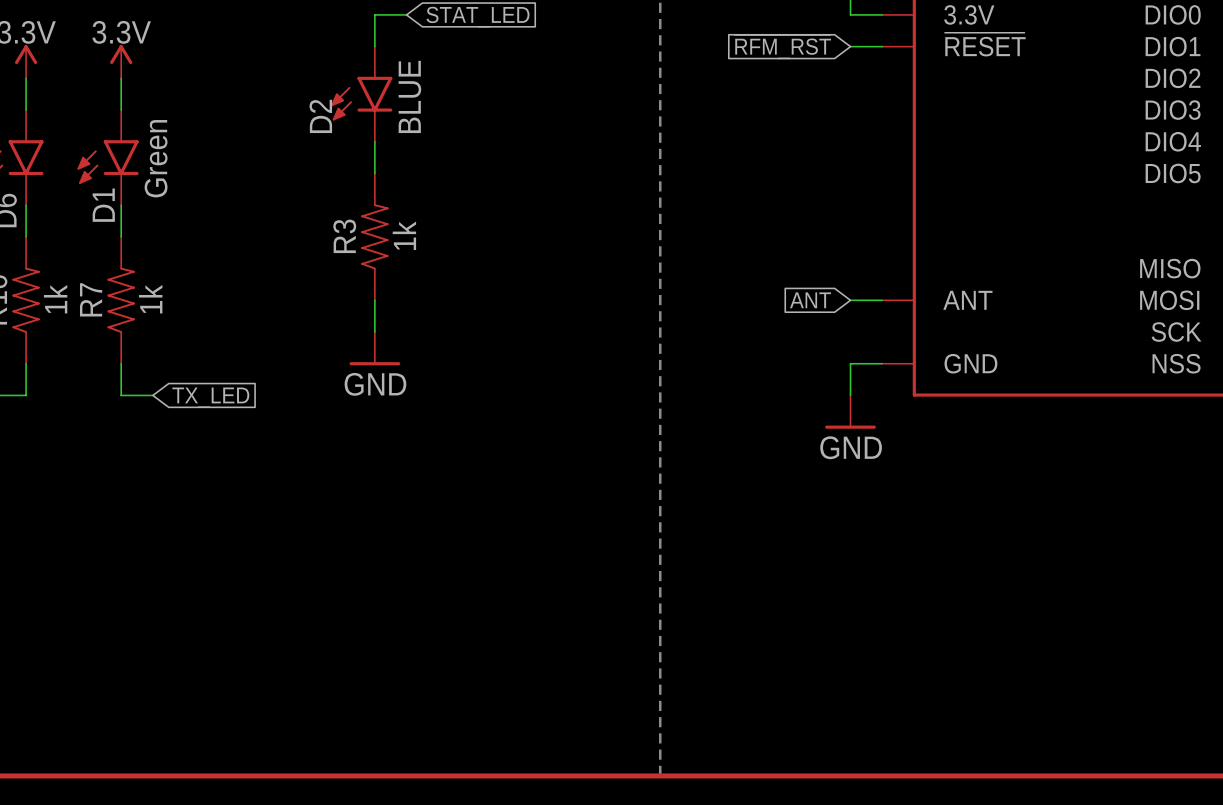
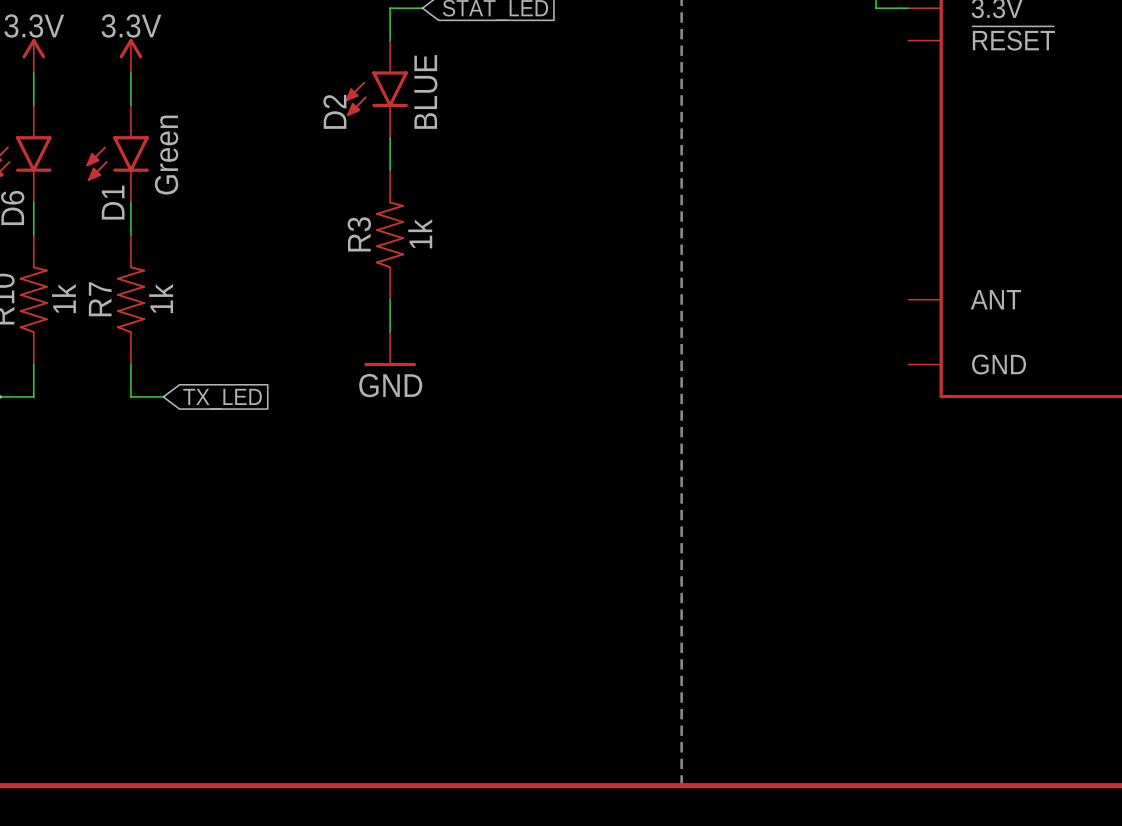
wire: (850, 46) (882, 46) -> none
global label: ~{RFM_RST} (782, 47) -> none
global label: ANT (810, 300) -> none
wire: (850, 300) (882, 300) -> none
wire: (882, 363) (850, 363) (850, 395) -> none
power symbol: GND (850, 412) -> none

